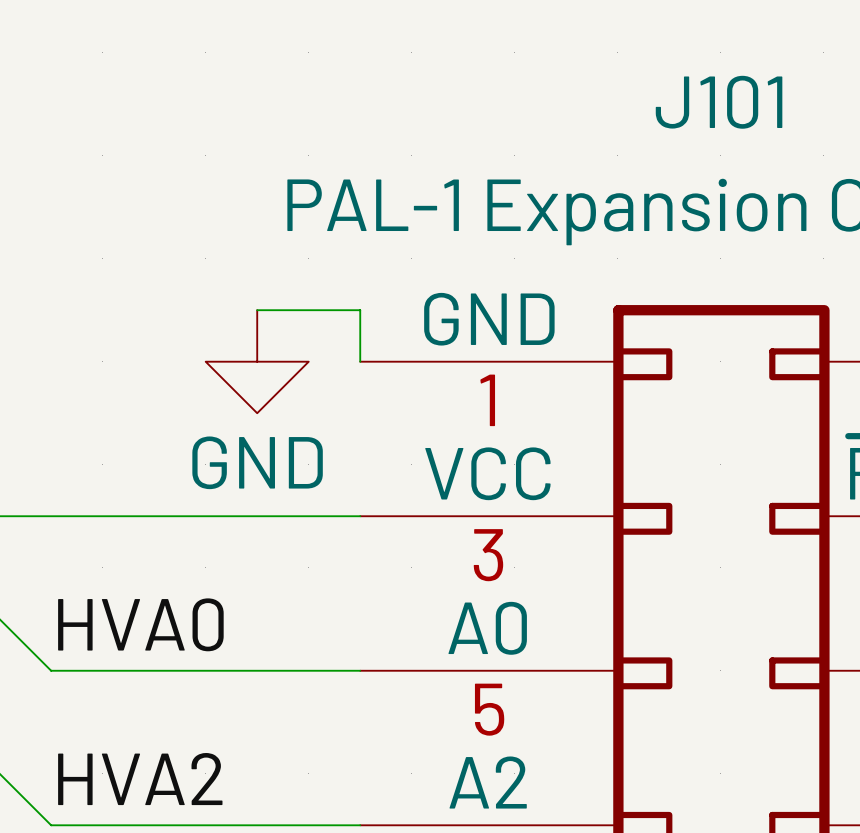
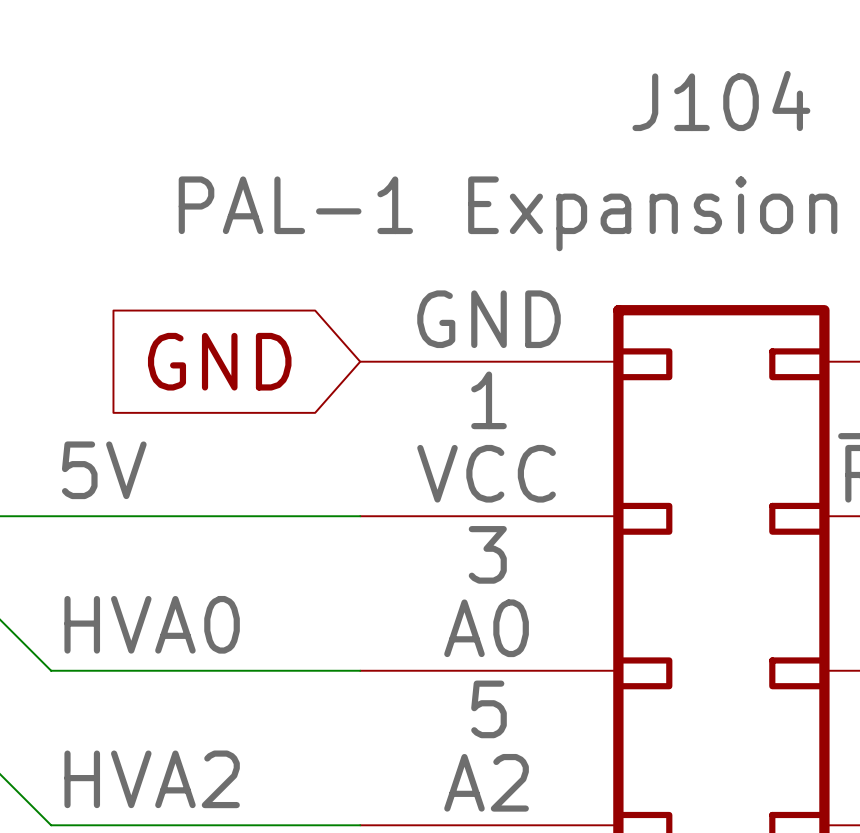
J101 name: J101 (719, 102) -> J104 (721, 101)
wire: (257, 310) (360, 310) (360, 361) -> none
global label: none -> GND (219, 361)
power symbol: GND (257, 361) -> none
label: none -> 5V (104, 470)

